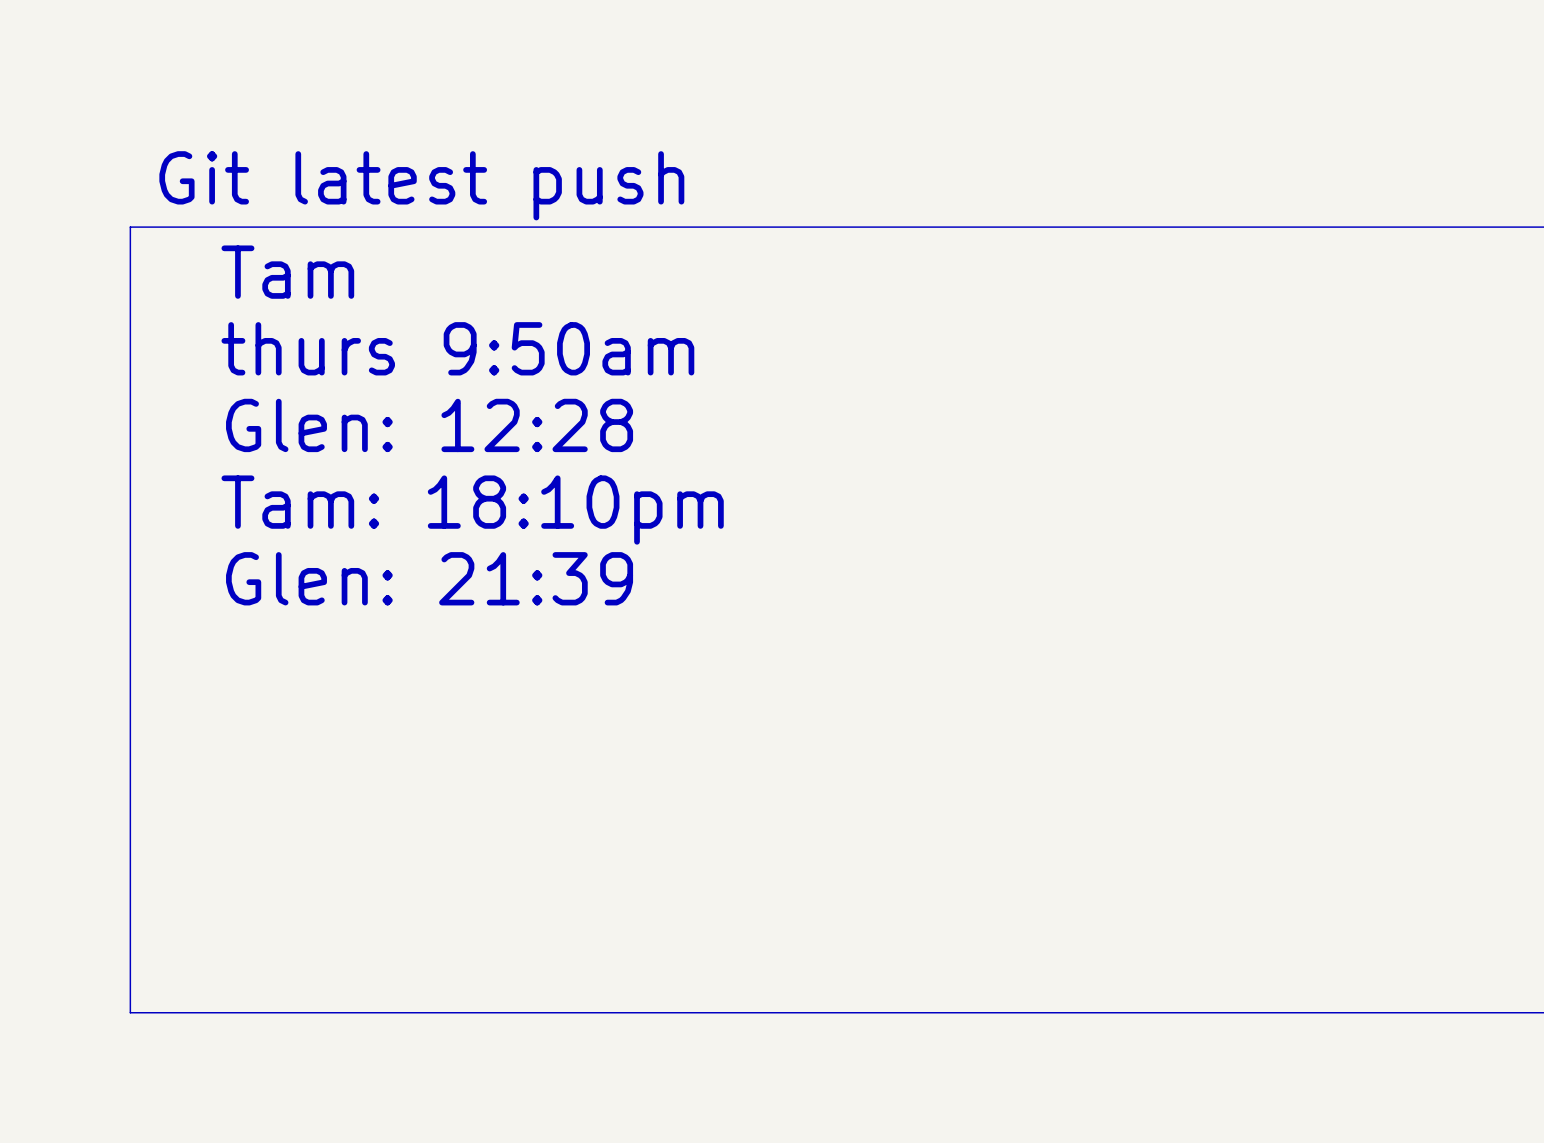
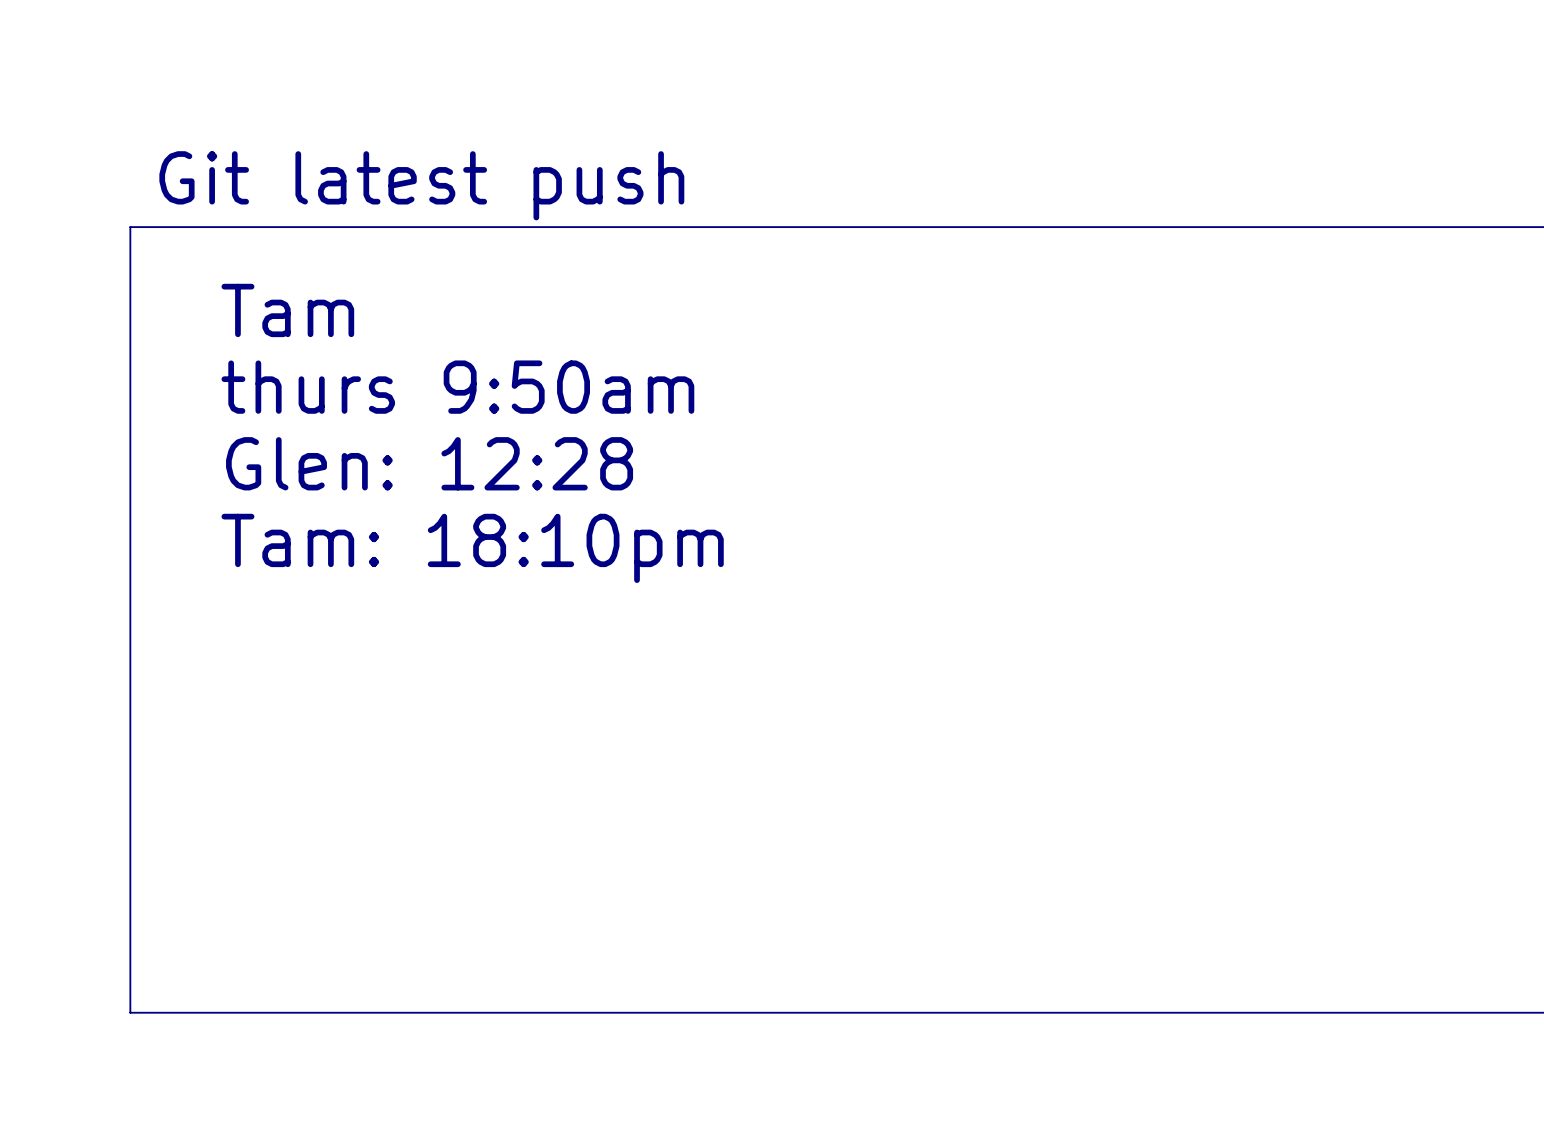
text position: Tam (287, 272) -> Tam (287, 310)
text position: thurs 9:50am (457, 348) -> thurs 9:50am (457, 387)
text position: Glen: 12:28 (429, 425) -> Glen: 12:28 (429, 463)
text position: Tam: 18:10pm (472, 510) -> Tam: 18:10pm (472, 548)
text: Glen: 21:39 (429, 578) -> none

